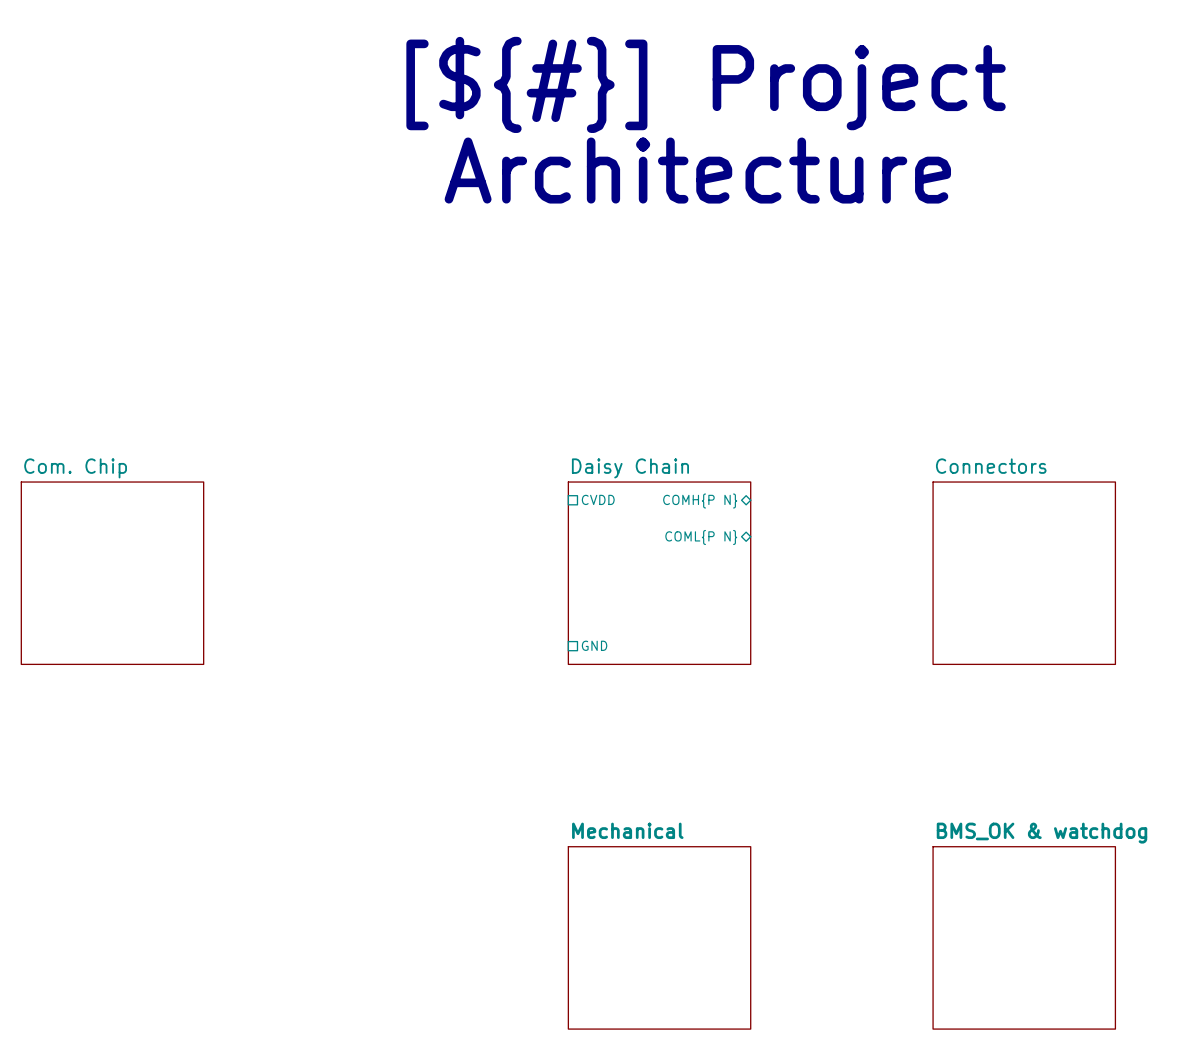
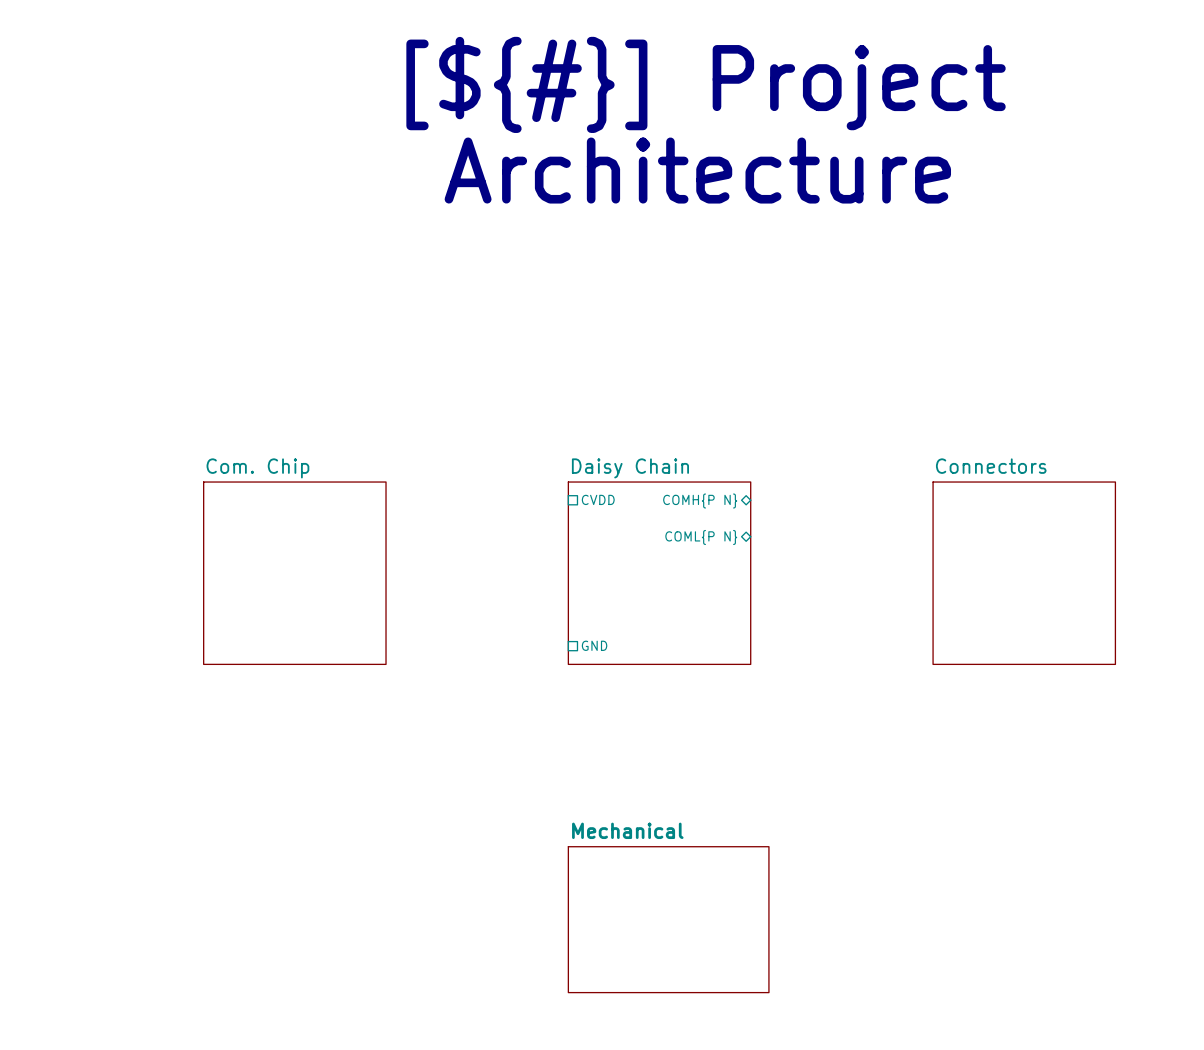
sheet Com. Chip: (112, 573) -> none
sheet Com. Chip: none -> (294, 573)
sheet Mechanical: none -> (668, 919)
sheet Mechanical: (659, 937) -> none
sheet BMS_OK & watchdog: (1024, 937) -> none

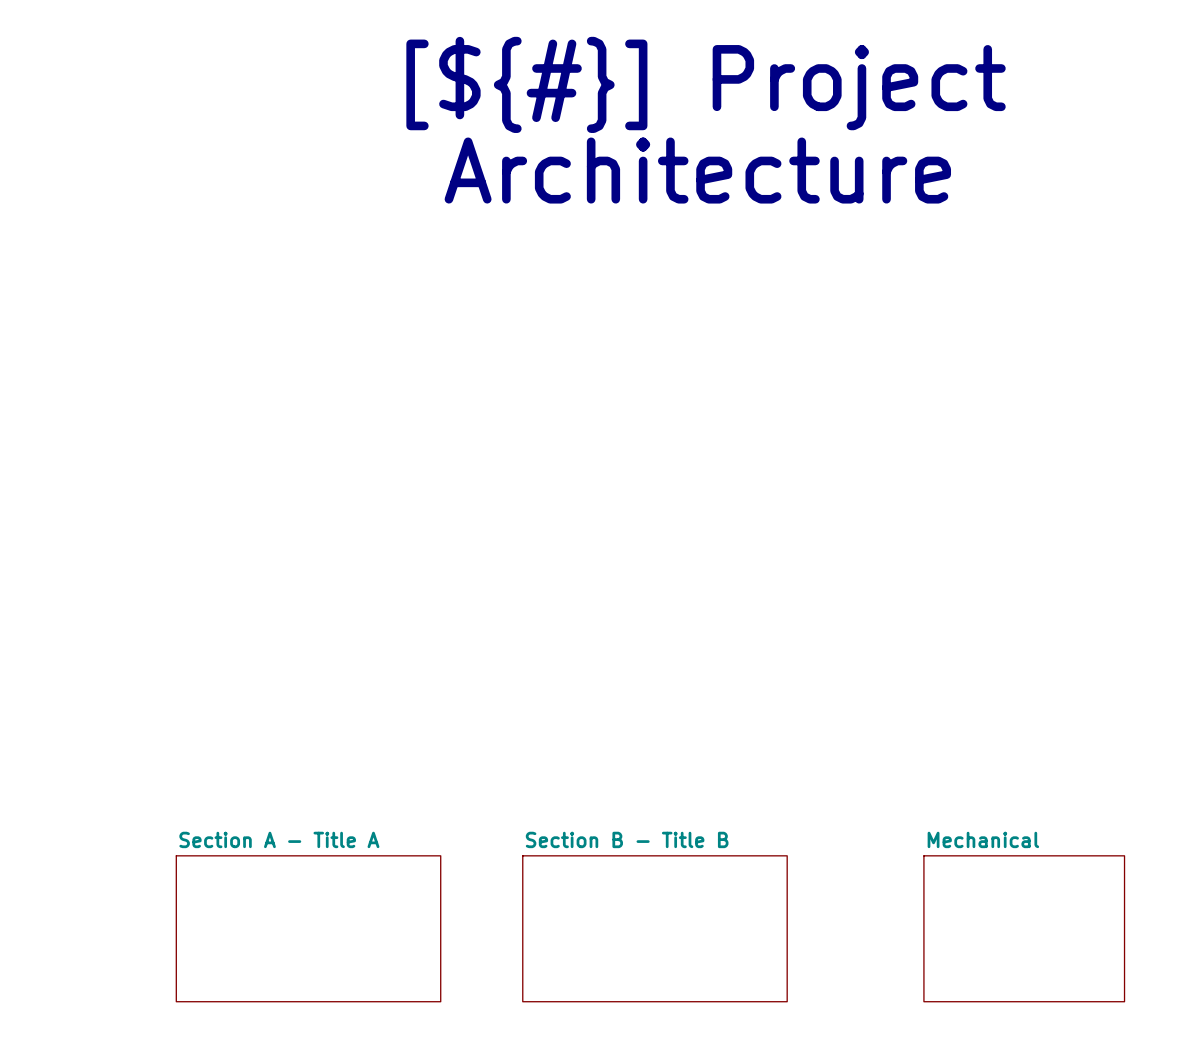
sheet pin: CVDD (598, 499) -> none
sheet pin: COMH{P N} (700, 501) -> none
sheet pin: COML{P N} (701, 537) -> none
sheet Com. Chip: (294, 573) -> none
sheet Daisy Chain: (659, 573) -> none
sheet Connectors: (1024, 573) -> none
sheet pin: GND (594, 645) -> none
sheet Mechanical: (668, 919) -> none
sheet Section A - Title A: none -> (308, 928)
sheet Section B - Title B: none -> (654, 928)
sheet Mechanical: none -> (1024, 928)

